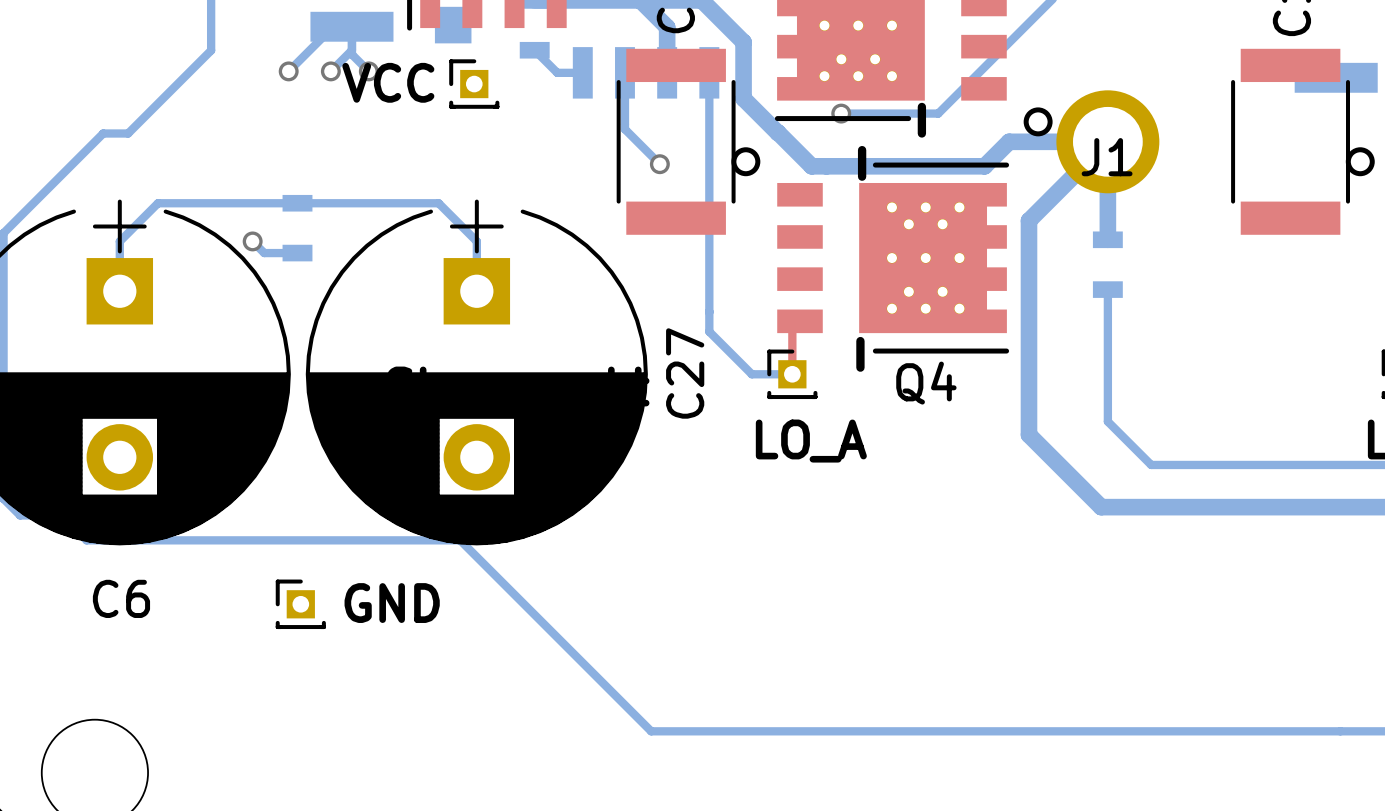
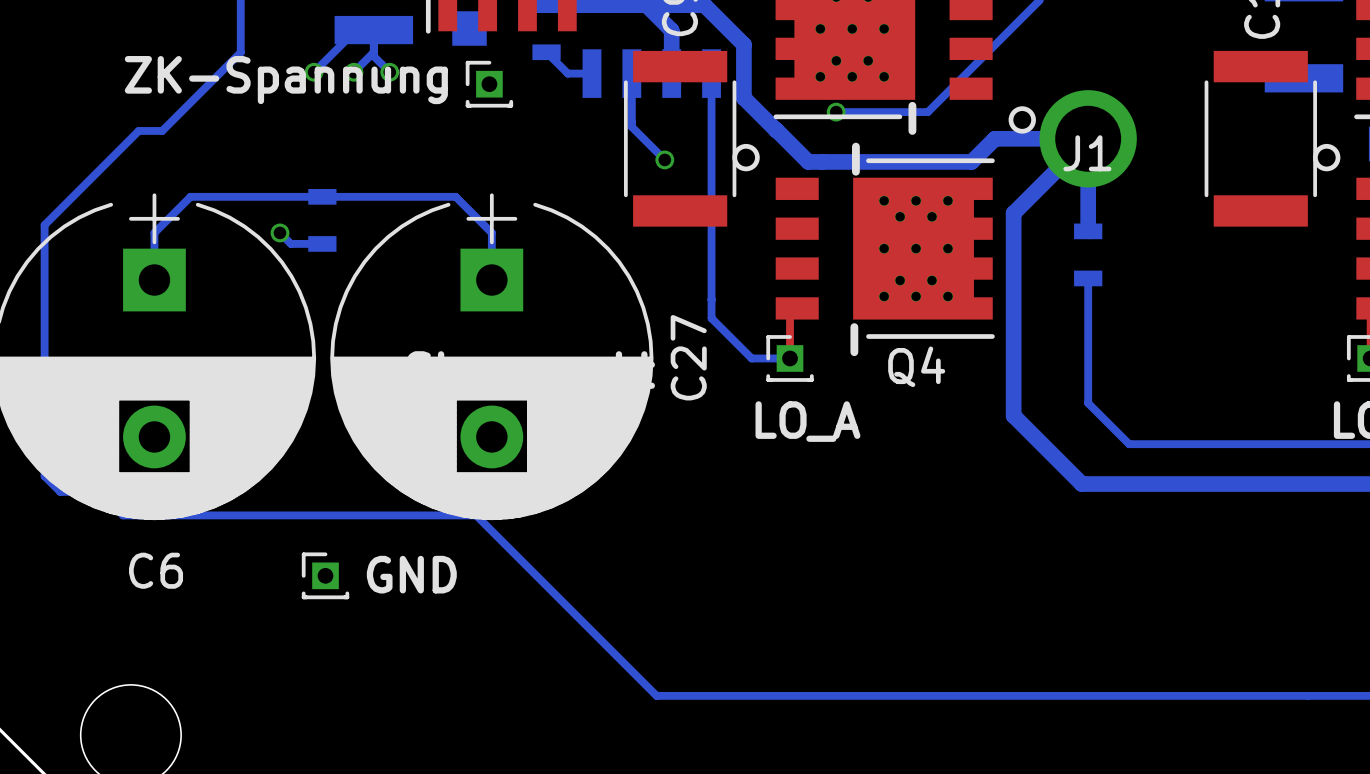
text: none -> ZK-Spannung (286, 80)
text: VCC (388, 82) -> none

